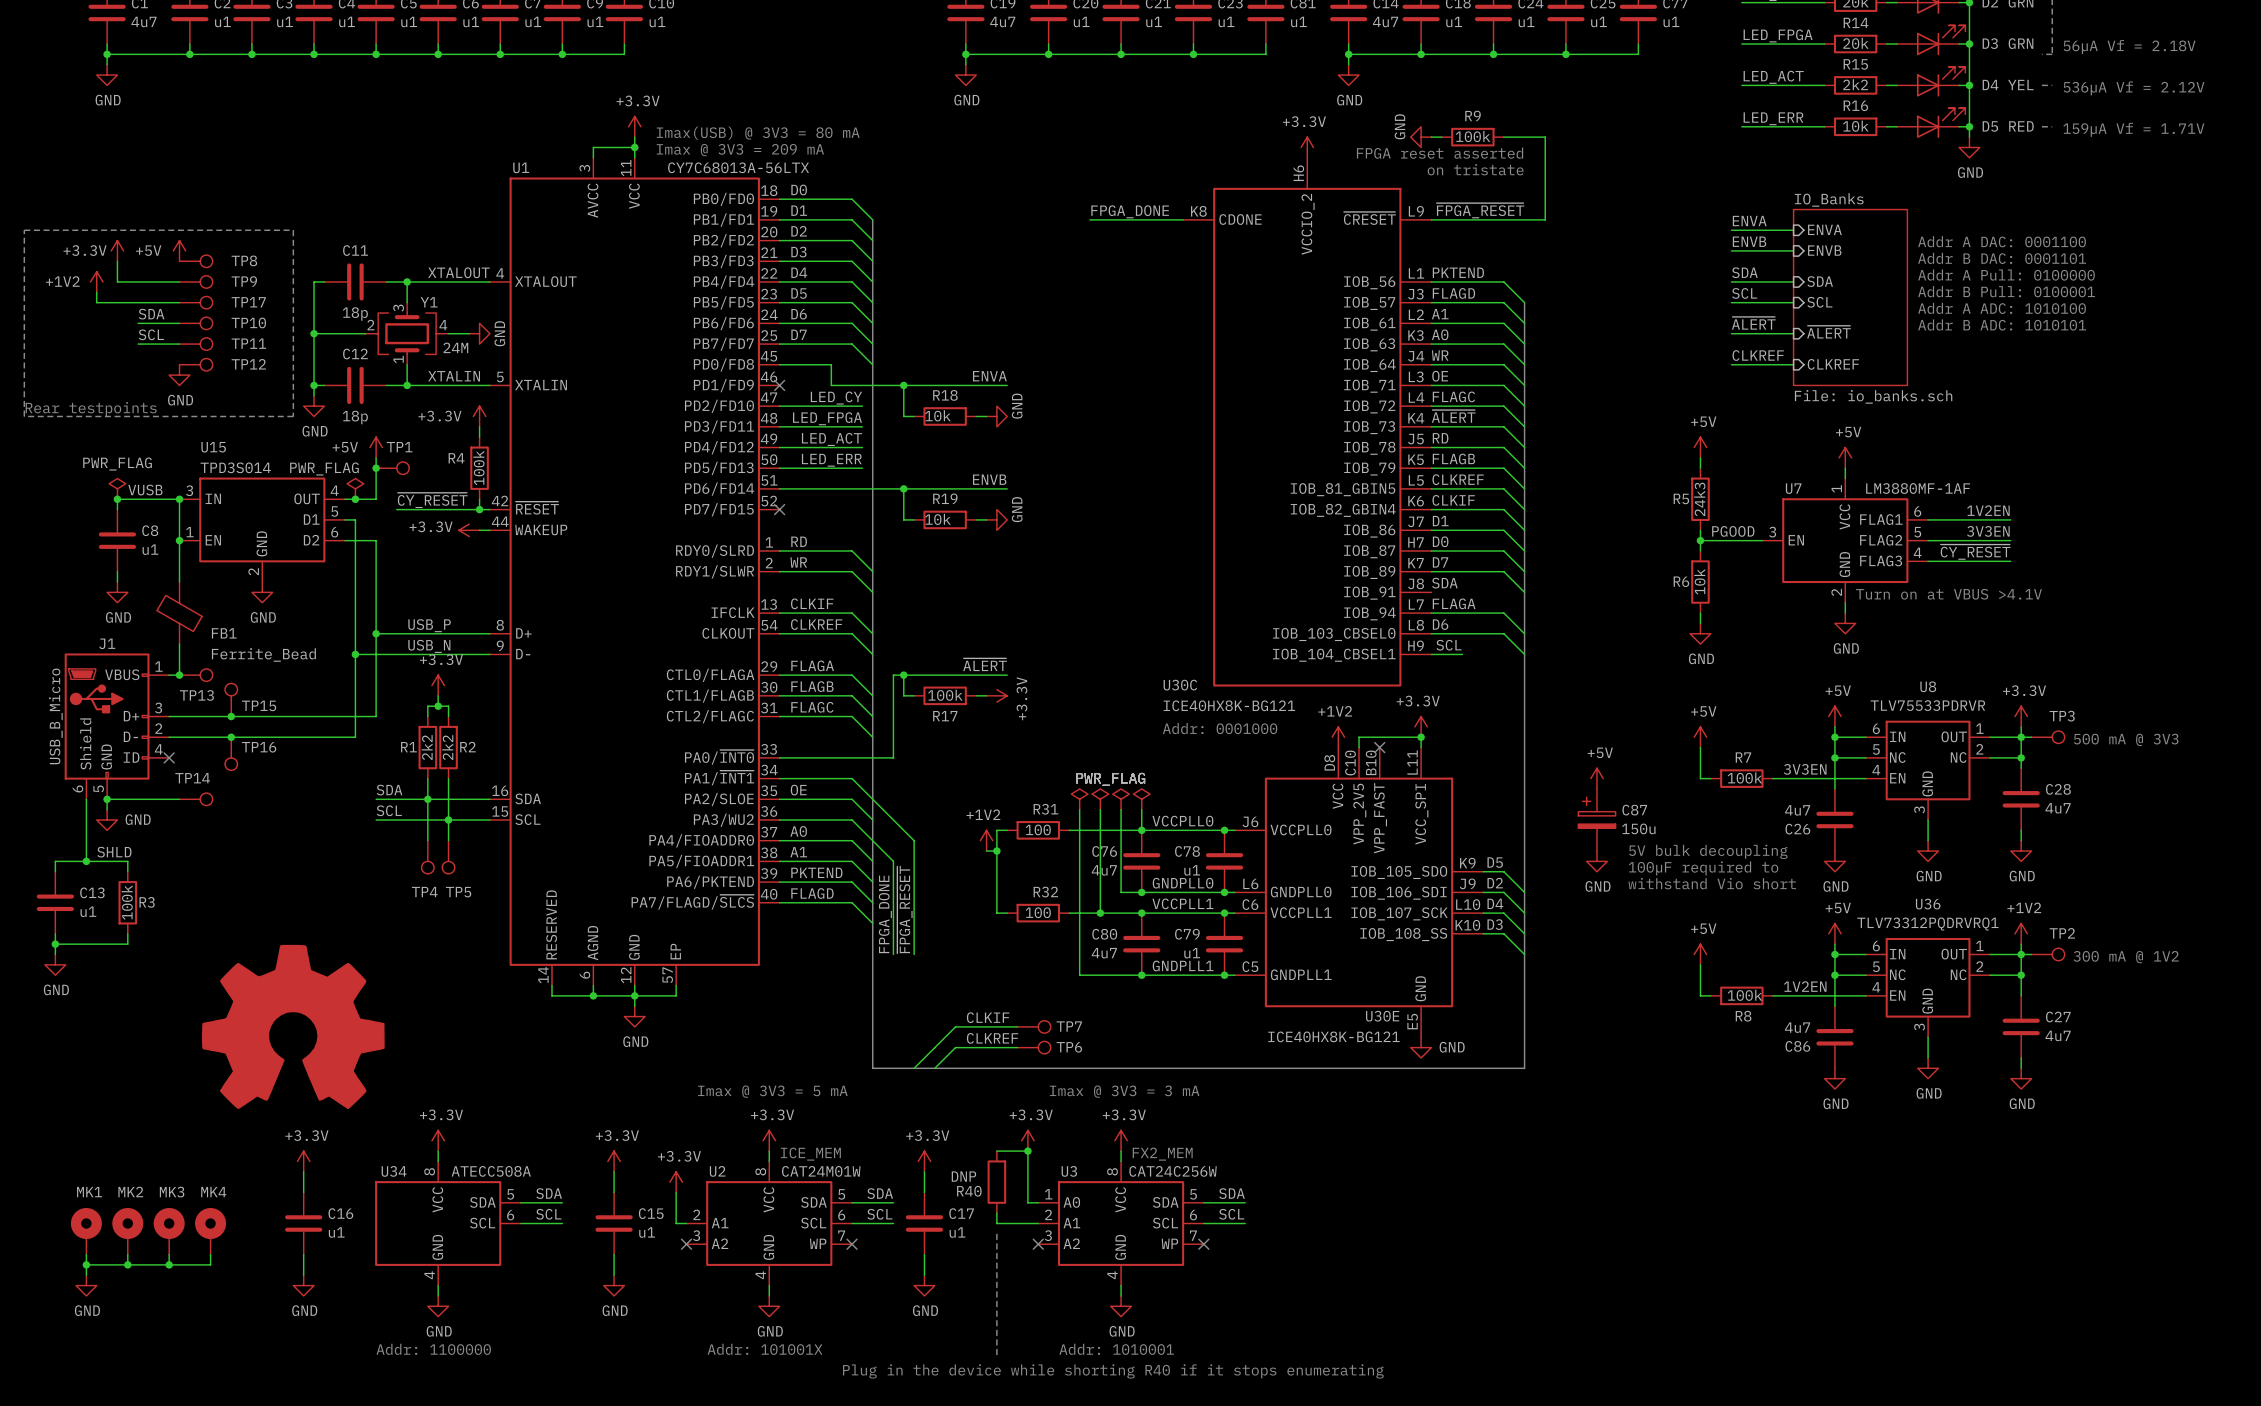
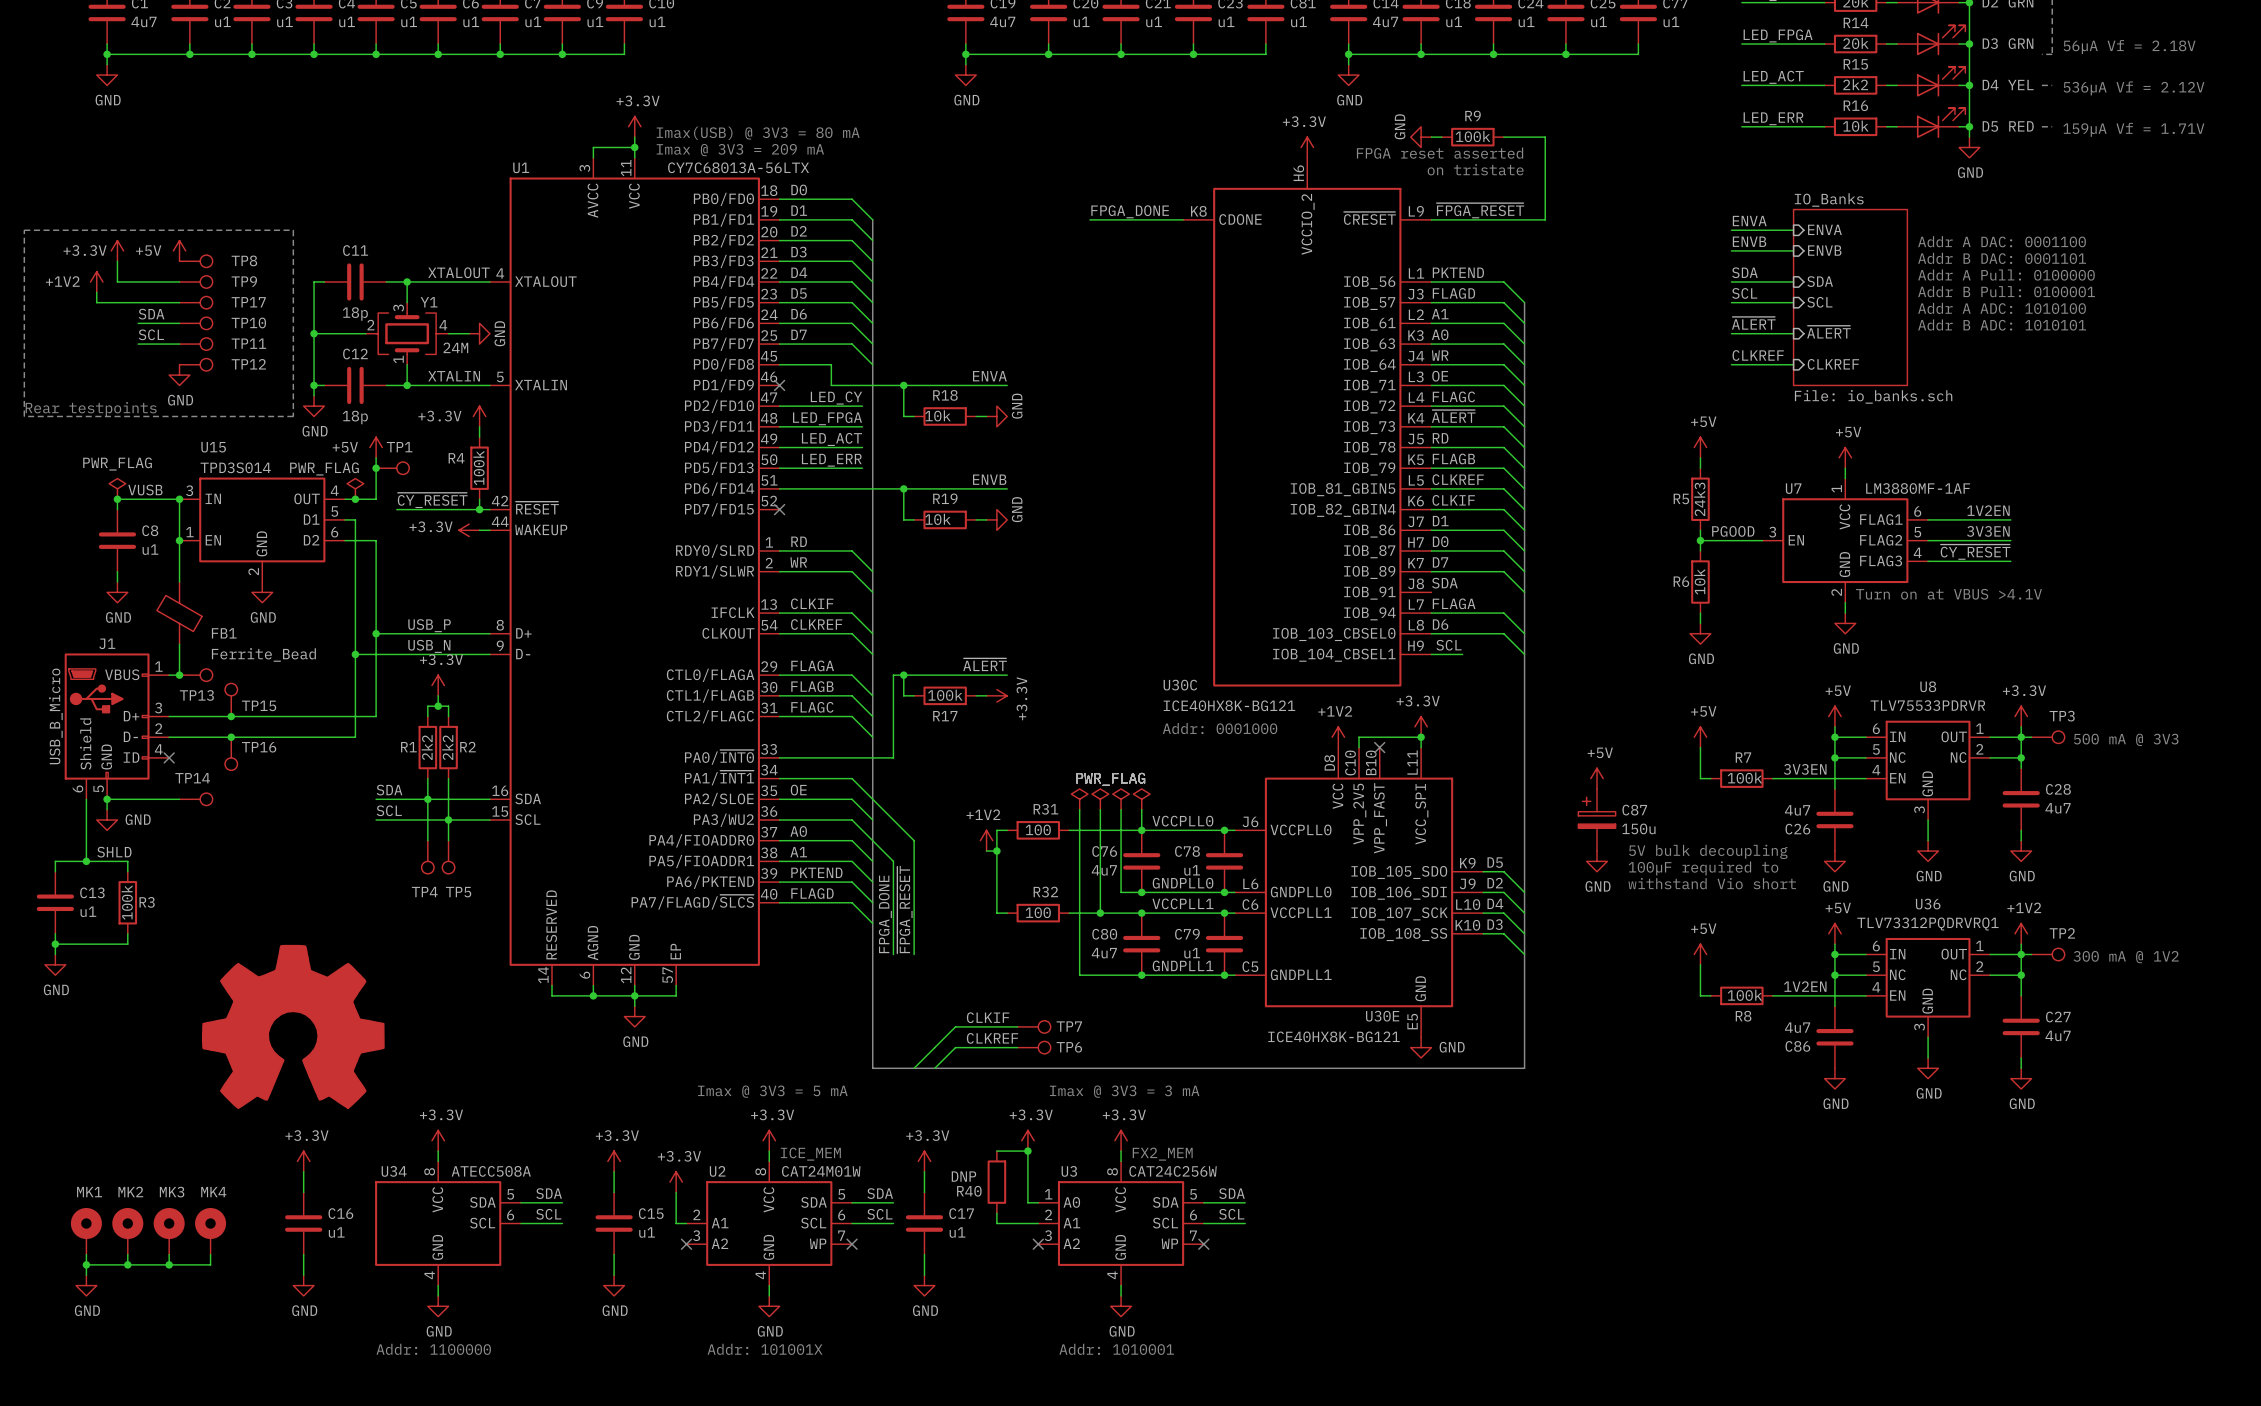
line: (996, 1233) (996, 1358) -> none
text: Plug in the device while shorting R40 if it stops enumerating (1113, 1371) -> none

